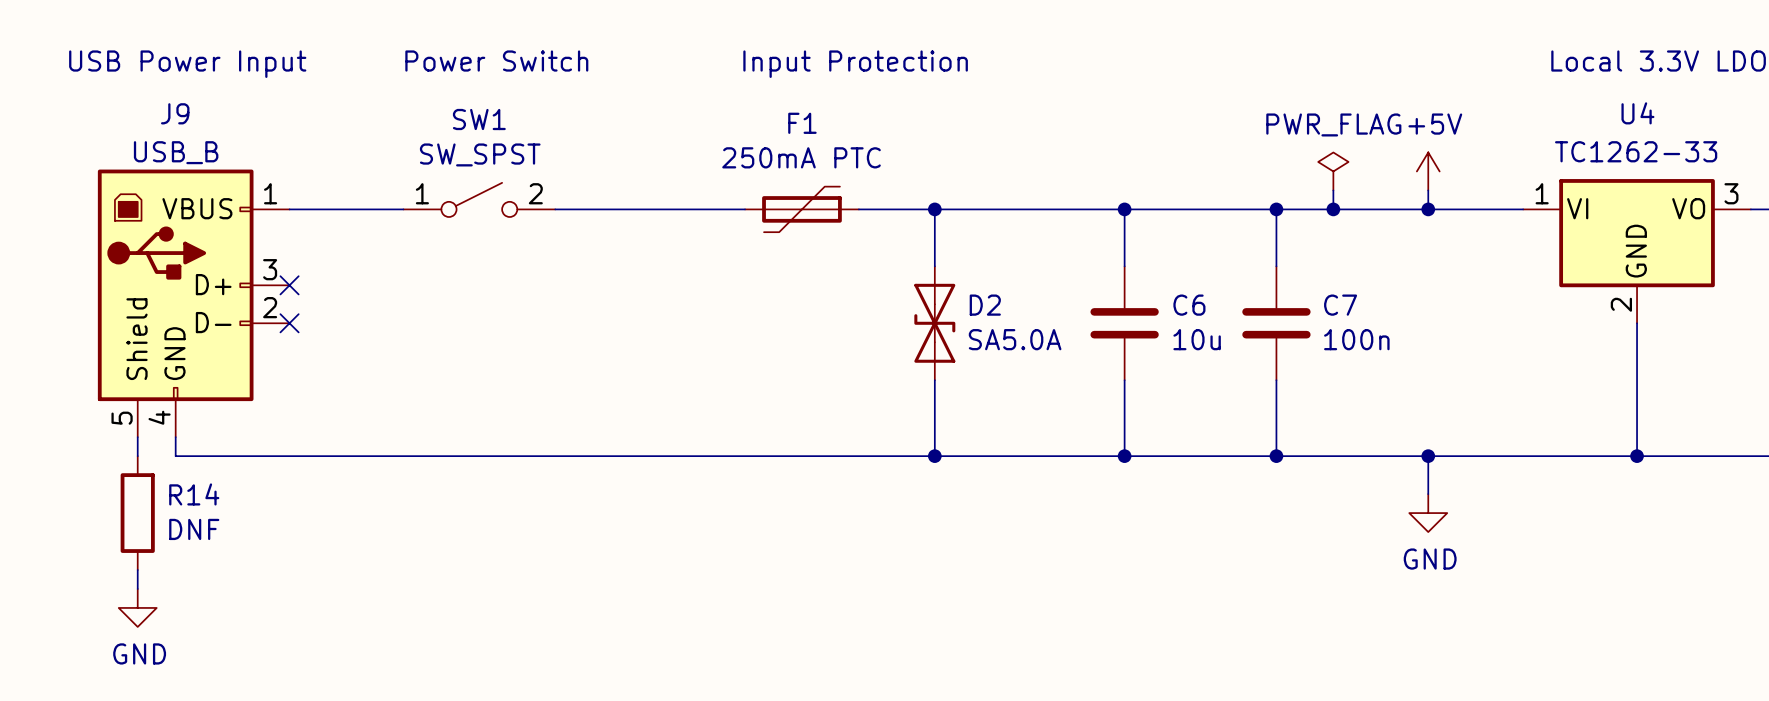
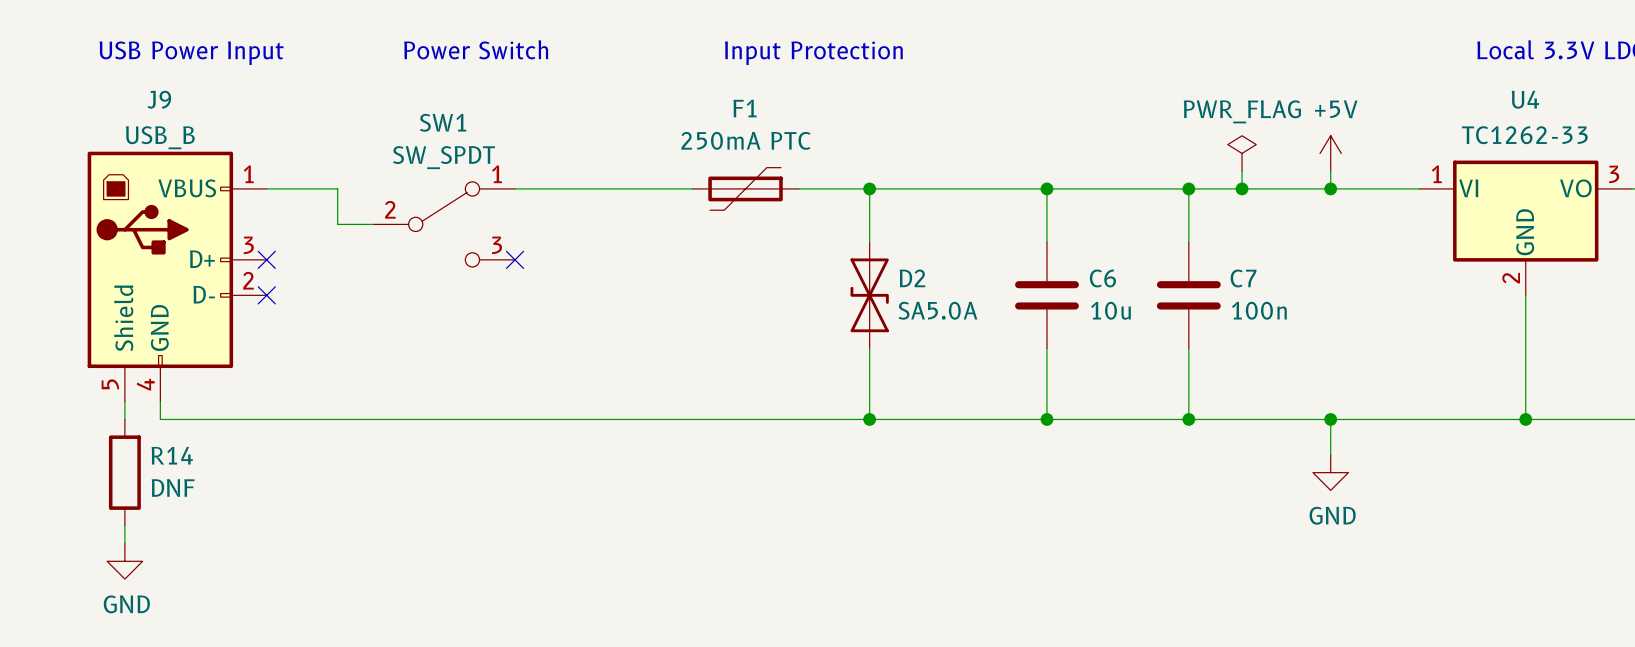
SW1 value: SW_SPST (480, 154) -> SW_SPDT (444, 157)
SW1 symbol: [403, 182, 556, 218] -> [373, 181, 516, 267]
wire: (365, 209) (403, 209) -> (337, 188) (337, 224) (373, 224)
no-connect mark: none -> (515, 259)

